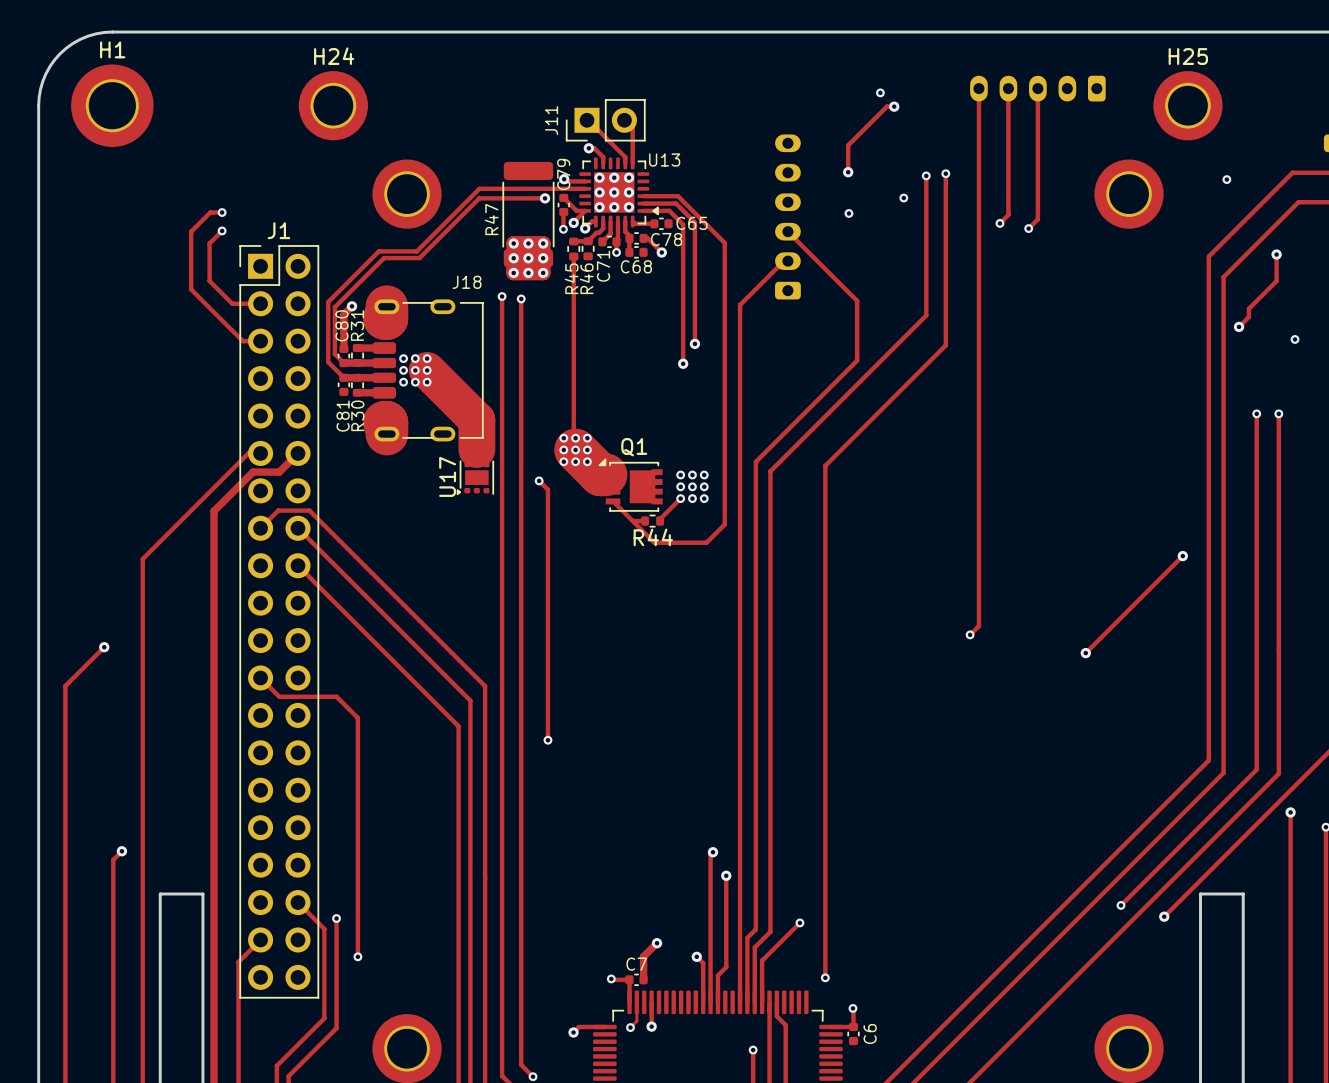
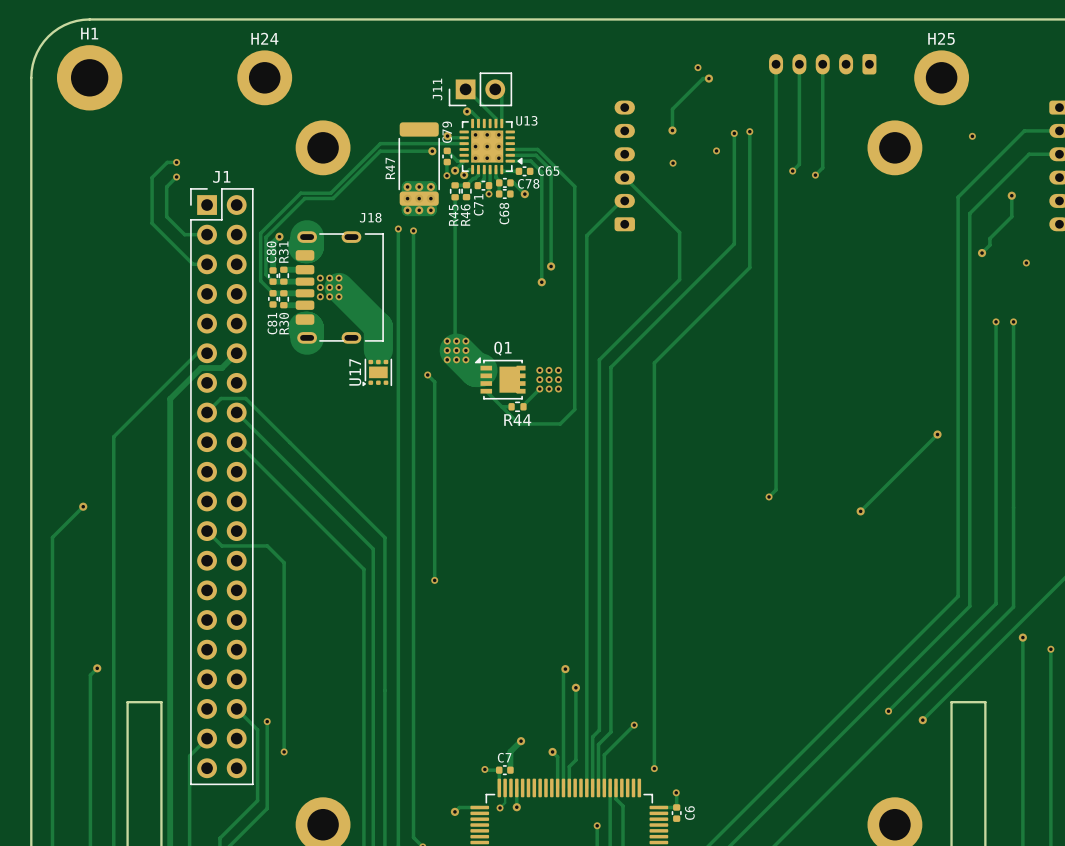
C68 name rotation: 0° (636, 266) -> 90° counterclockwise (504, 213)

